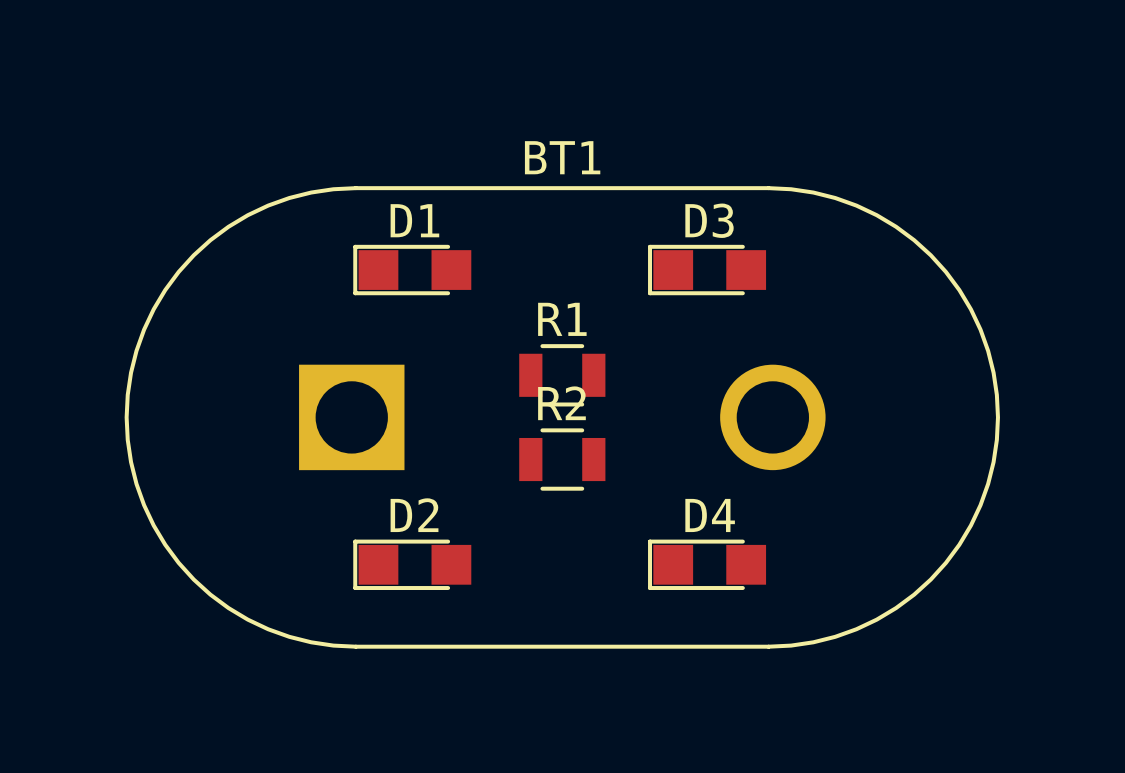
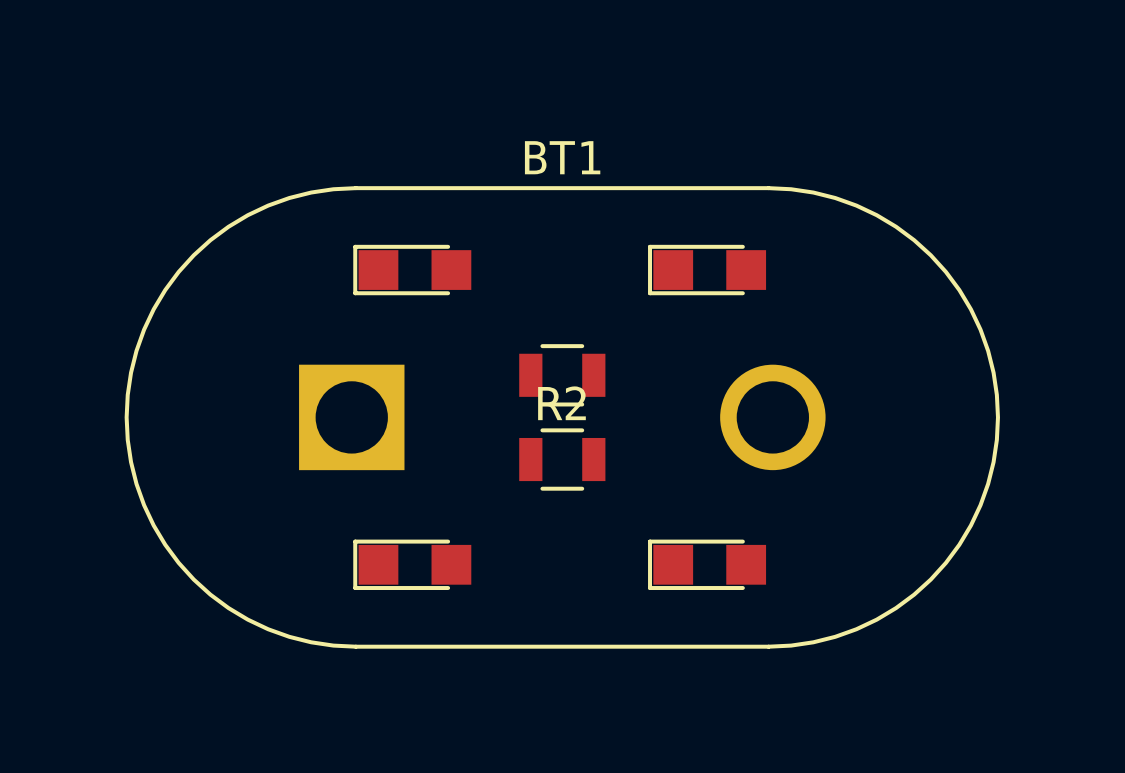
D1 name: D1 (414, 220) -> none
D3 name: D3 (709, 220) -> none
R1 name: R1 (562, 319) -> none
D2 name: D2 (414, 515) -> none
D4 name: D4 (710, 515) -> none

